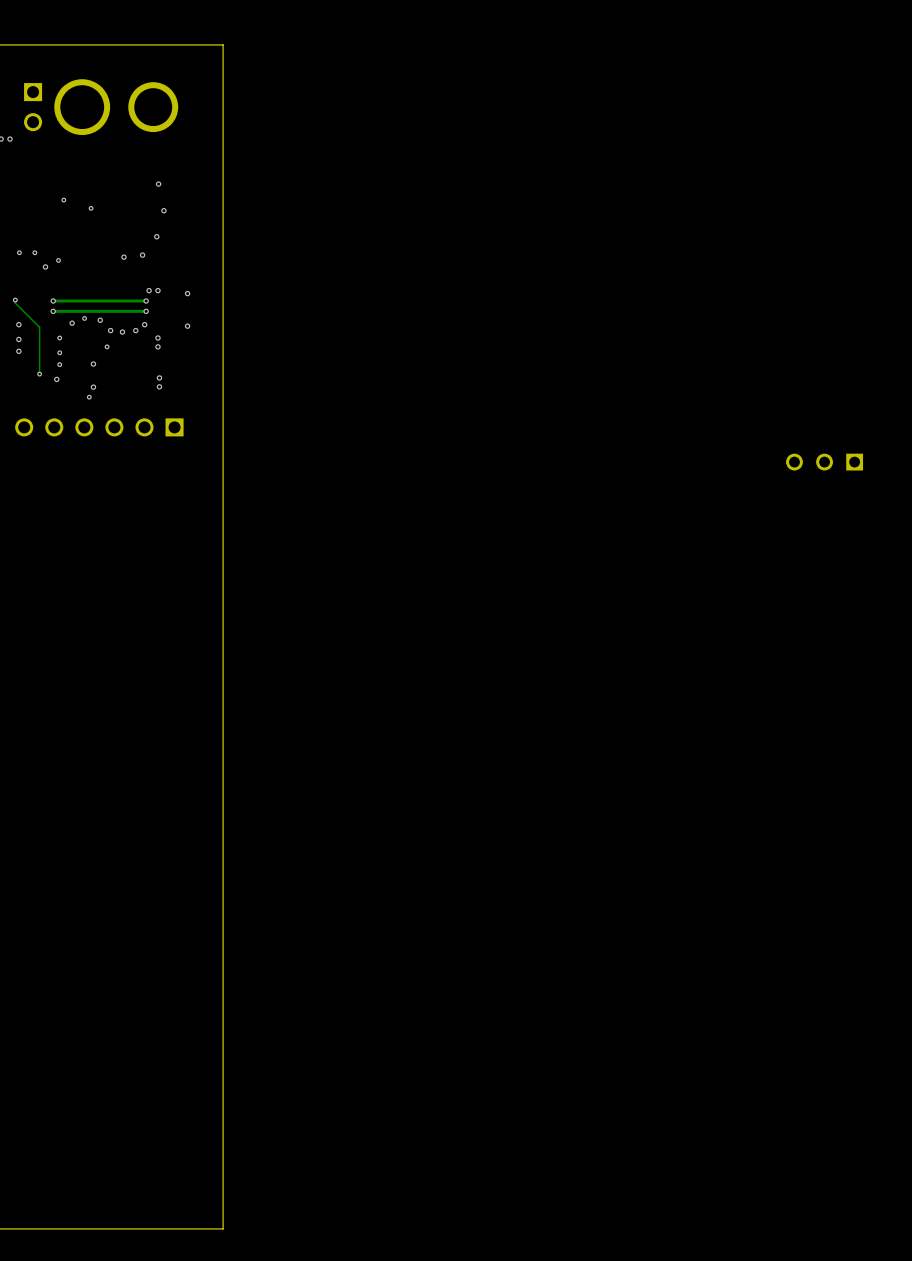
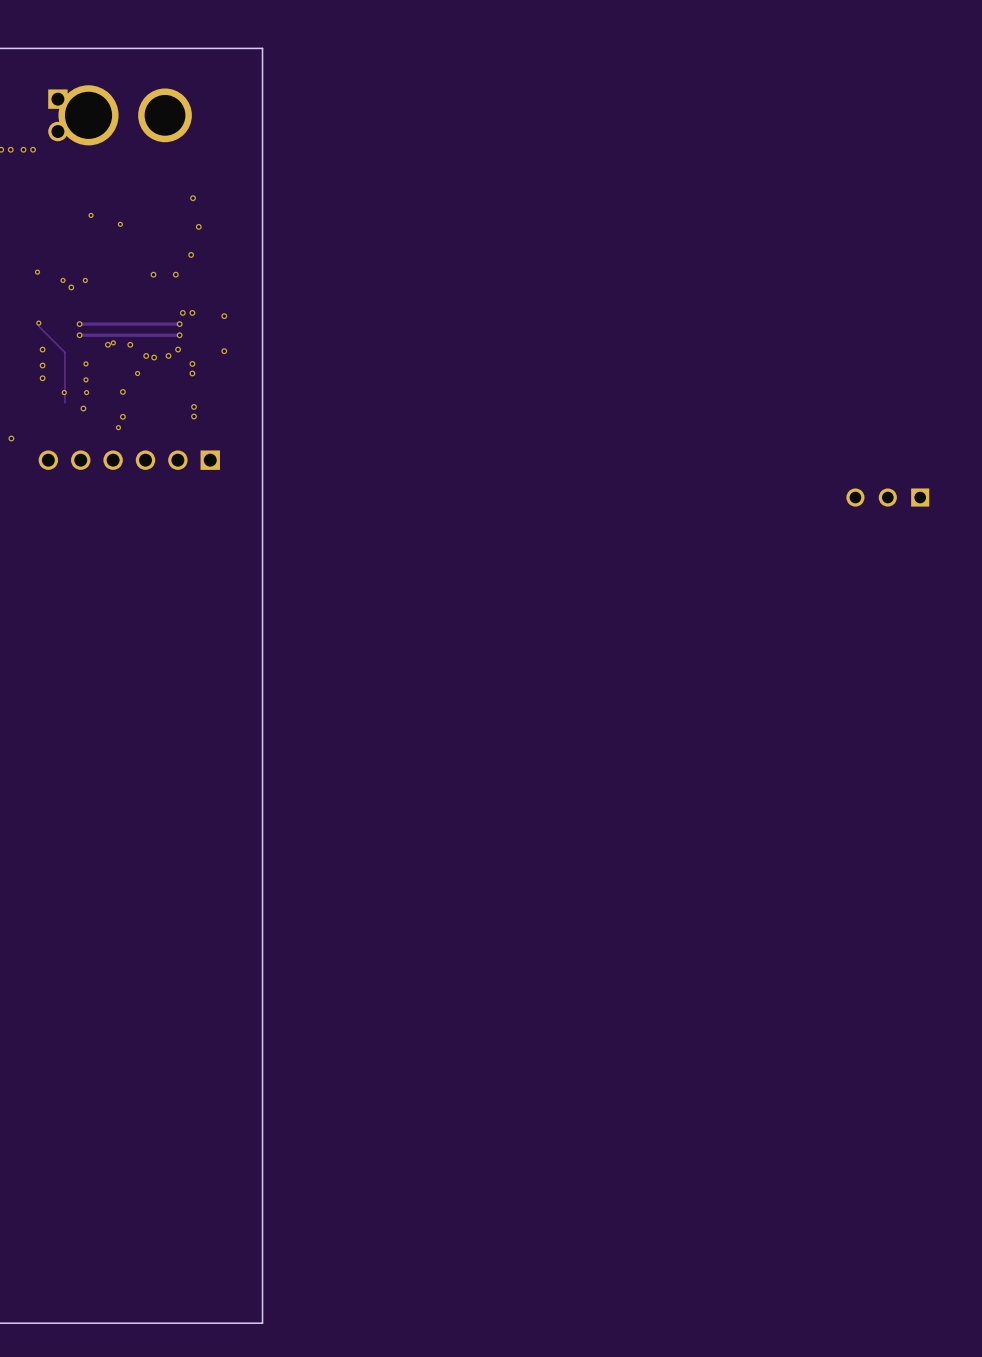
board edge: (223, 44) (223, 1228) -> (240, 48) (262, 48) (262, 1323) (240, 1323)
part position: (33, 107) -> (57, 115)
via: none -> (23, 149)
via: none -> (33, 149)
via: (158, 184) -> none
via: none -> (193, 198)
via: (63, 200) -> none
via: none -> (91, 215)
via: (91, 208) -> none
via: none -> (120, 224)
via: (163, 210) -> none
via: none -> (198, 226)
via: (156, 236) -> none
via: none -> (191, 254)
via: (19, 252) -> none
via: none -> (175, 274)
via: (123, 257) -> none
via: none -> (85, 280)
via: (45, 266) -> none
via: none -> (71, 287)
via: (149, 290) -> none
via: (157, 290) -> none
via: none -> (182, 312)
via: none -> (192, 312)
via: (187, 293) -> none
via: none -> (224, 316)
track: (15, 300) (15, 303) (39, 327) (39, 374) -> (38, 323) (38, 326) (64, 352) (64, 402)
via position: (15, 300) -> (38, 323)
via: (53, 300) -> none
track: (73, 300) (53, 300) -> (179, 324) (157, 324)
via: none -> (79, 324)
via: (146, 300) -> none
via: none -> (179, 324)
via: (53, 311) -> none
track: (73, 311) (53, 311) -> (179, 335) (157, 335)
via: none -> (79, 335)
via: (146, 311) -> none
via: none -> (179, 335)
via: (84, 318) -> none
via: none -> (113, 342)
via: none -> (130, 344)
via: (72, 323) -> none
via: (18, 324) -> none
via: none -> (42, 349)
via: (144, 324) -> none
via: none -> (178, 349)
via: (187, 326) -> none
via: none -> (224, 351)
via: (110, 330) -> none
via: none -> (168, 355)
via: (122, 332) -> none
via: none -> (154, 357)
via: (59, 337) -> none
via: none -> (85, 363)
via: (157, 337) -> none
via: none -> (192, 363)
via: (18, 339) -> none
via: none -> (42, 365)
via: (107, 346) -> none
via: none -> (137, 373)
via: (157, 346) -> none
via: none -> (192, 373)
via: (18, 351) -> none
via: none -> (42, 378)
via: (59, 352) -> none
via: none -> (85, 379)
via: none -> (86, 392)
via: (93, 364) -> none
via: none -> (122, 391)
via: (39, 374) -> none
via: (159, 377) -> none
via: none -> (194, 406)
via: (56, 379) -> none
via: none -> (83, 408)
via: (159, 386) -> none
via: none -> (194, 416)
via: (93, 387) -> none
via: none -> (122, 416)
via: (89, 397) -> none
via: none -> (118, 427)
via: none -> (11, 438)
part position: (99, 427) -> (129, 460)

